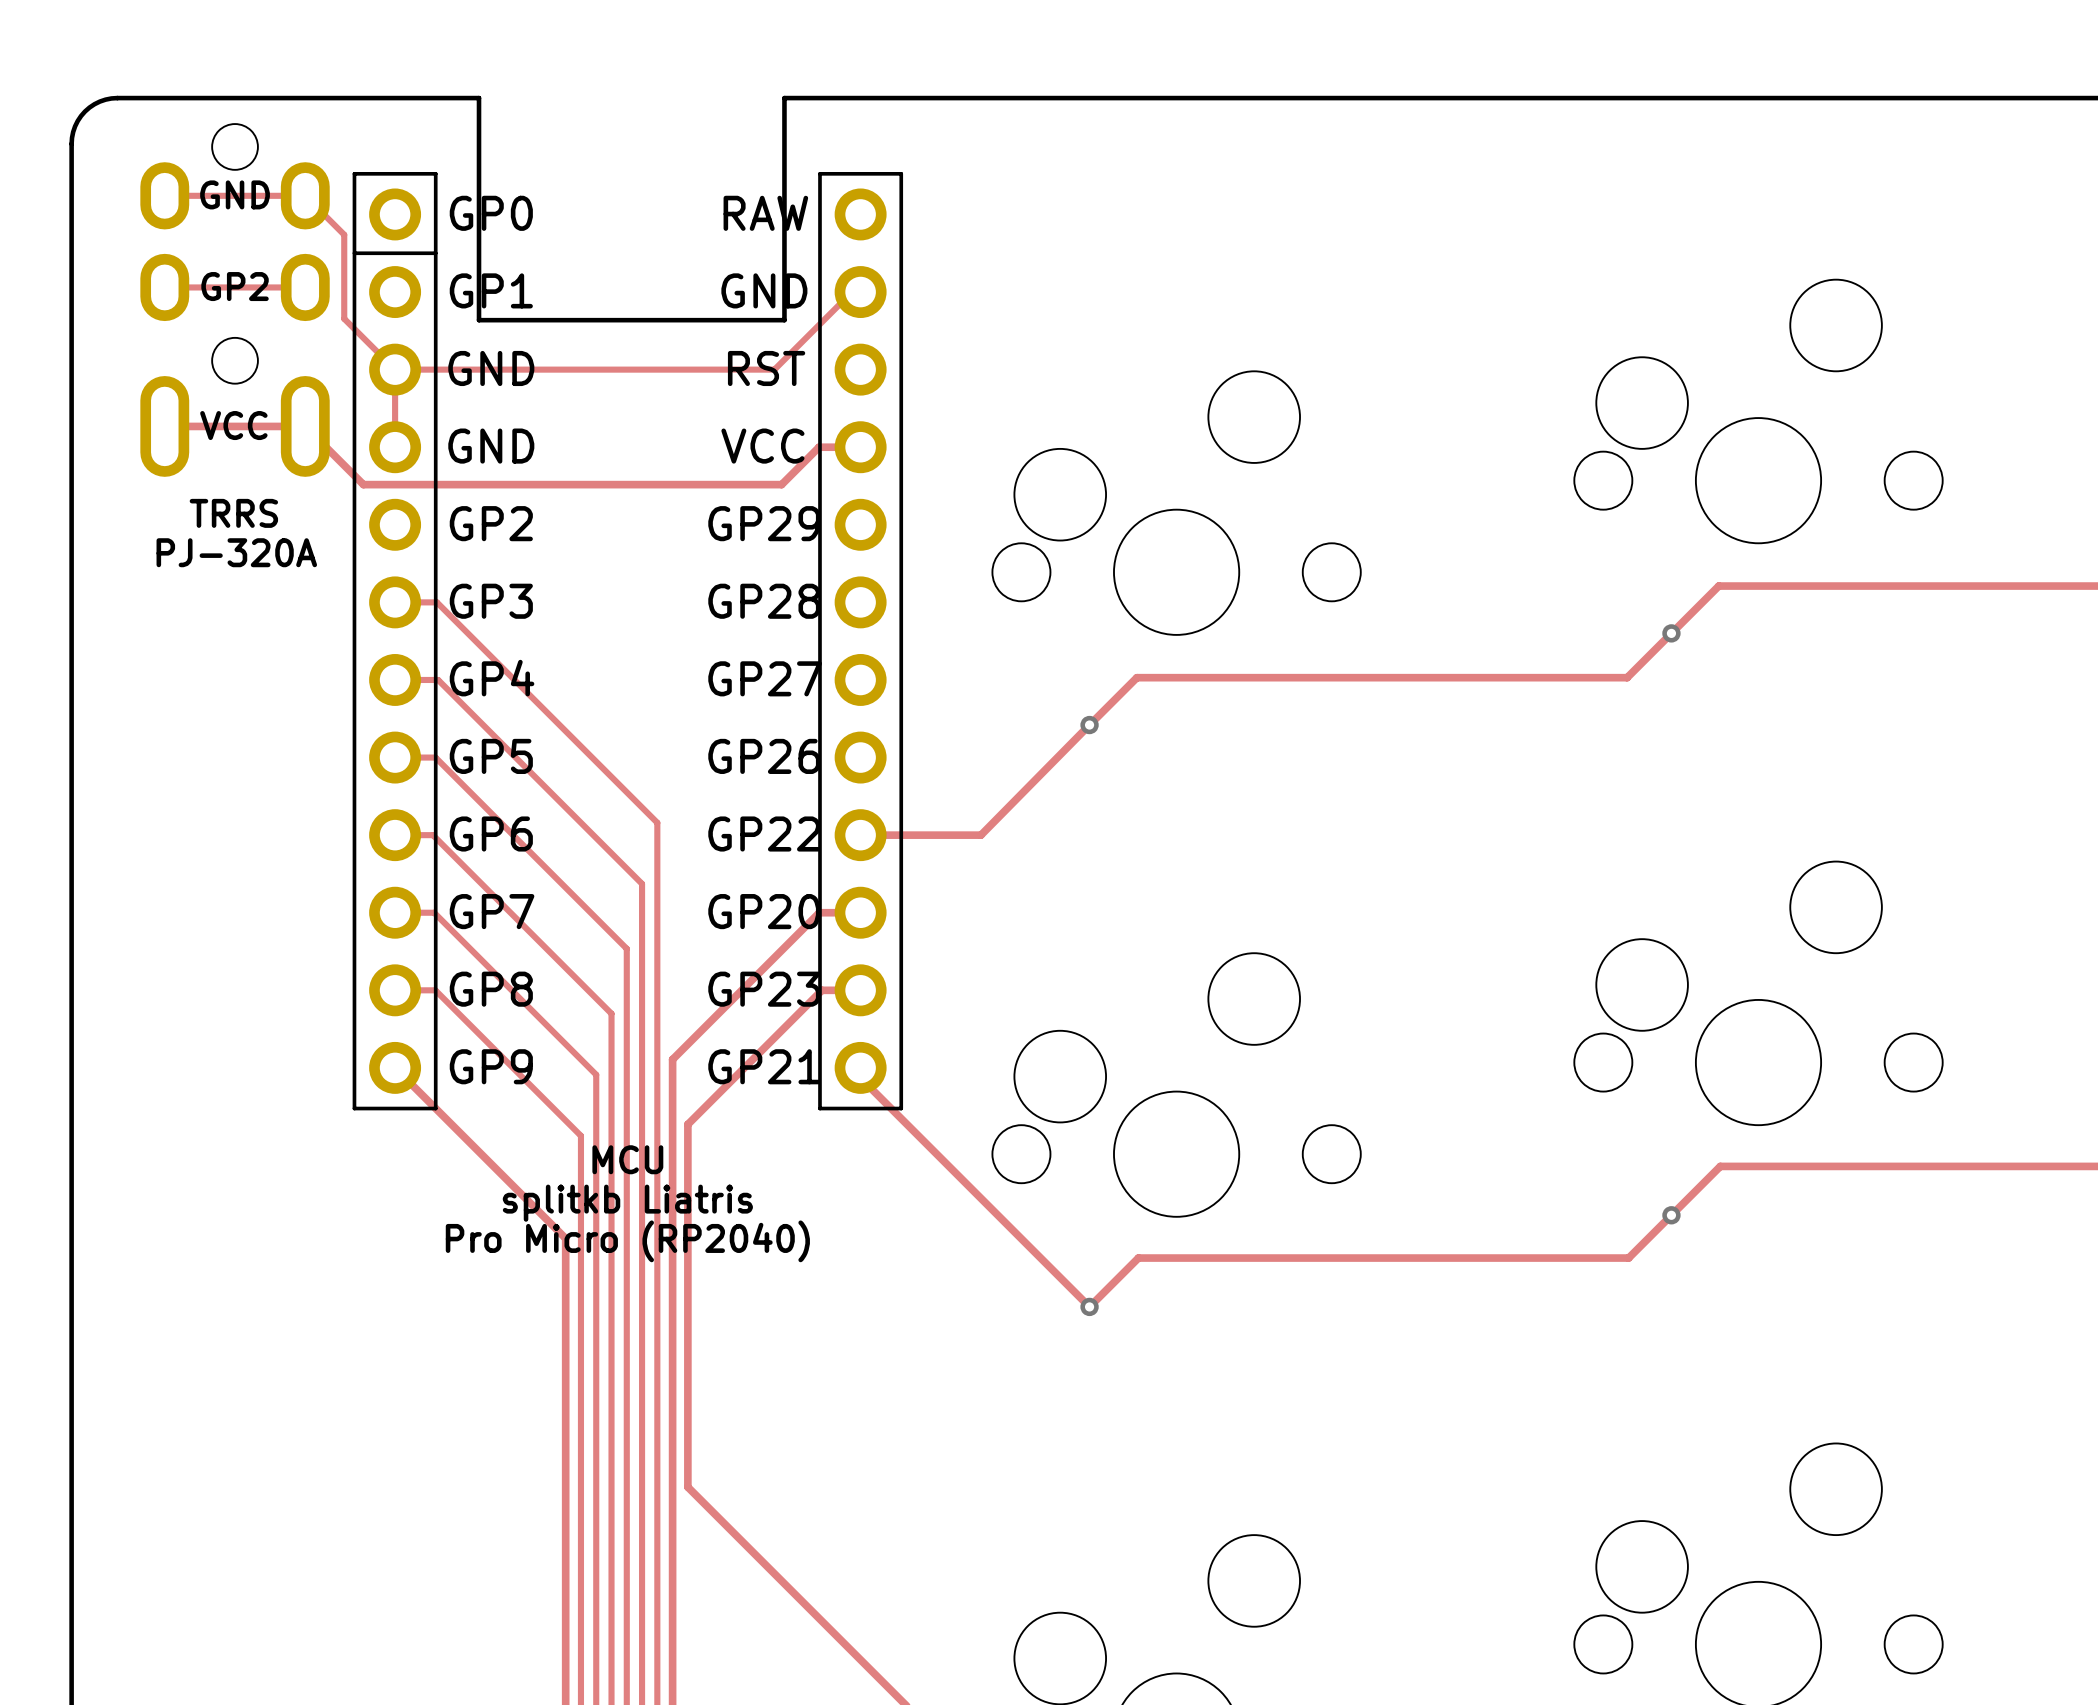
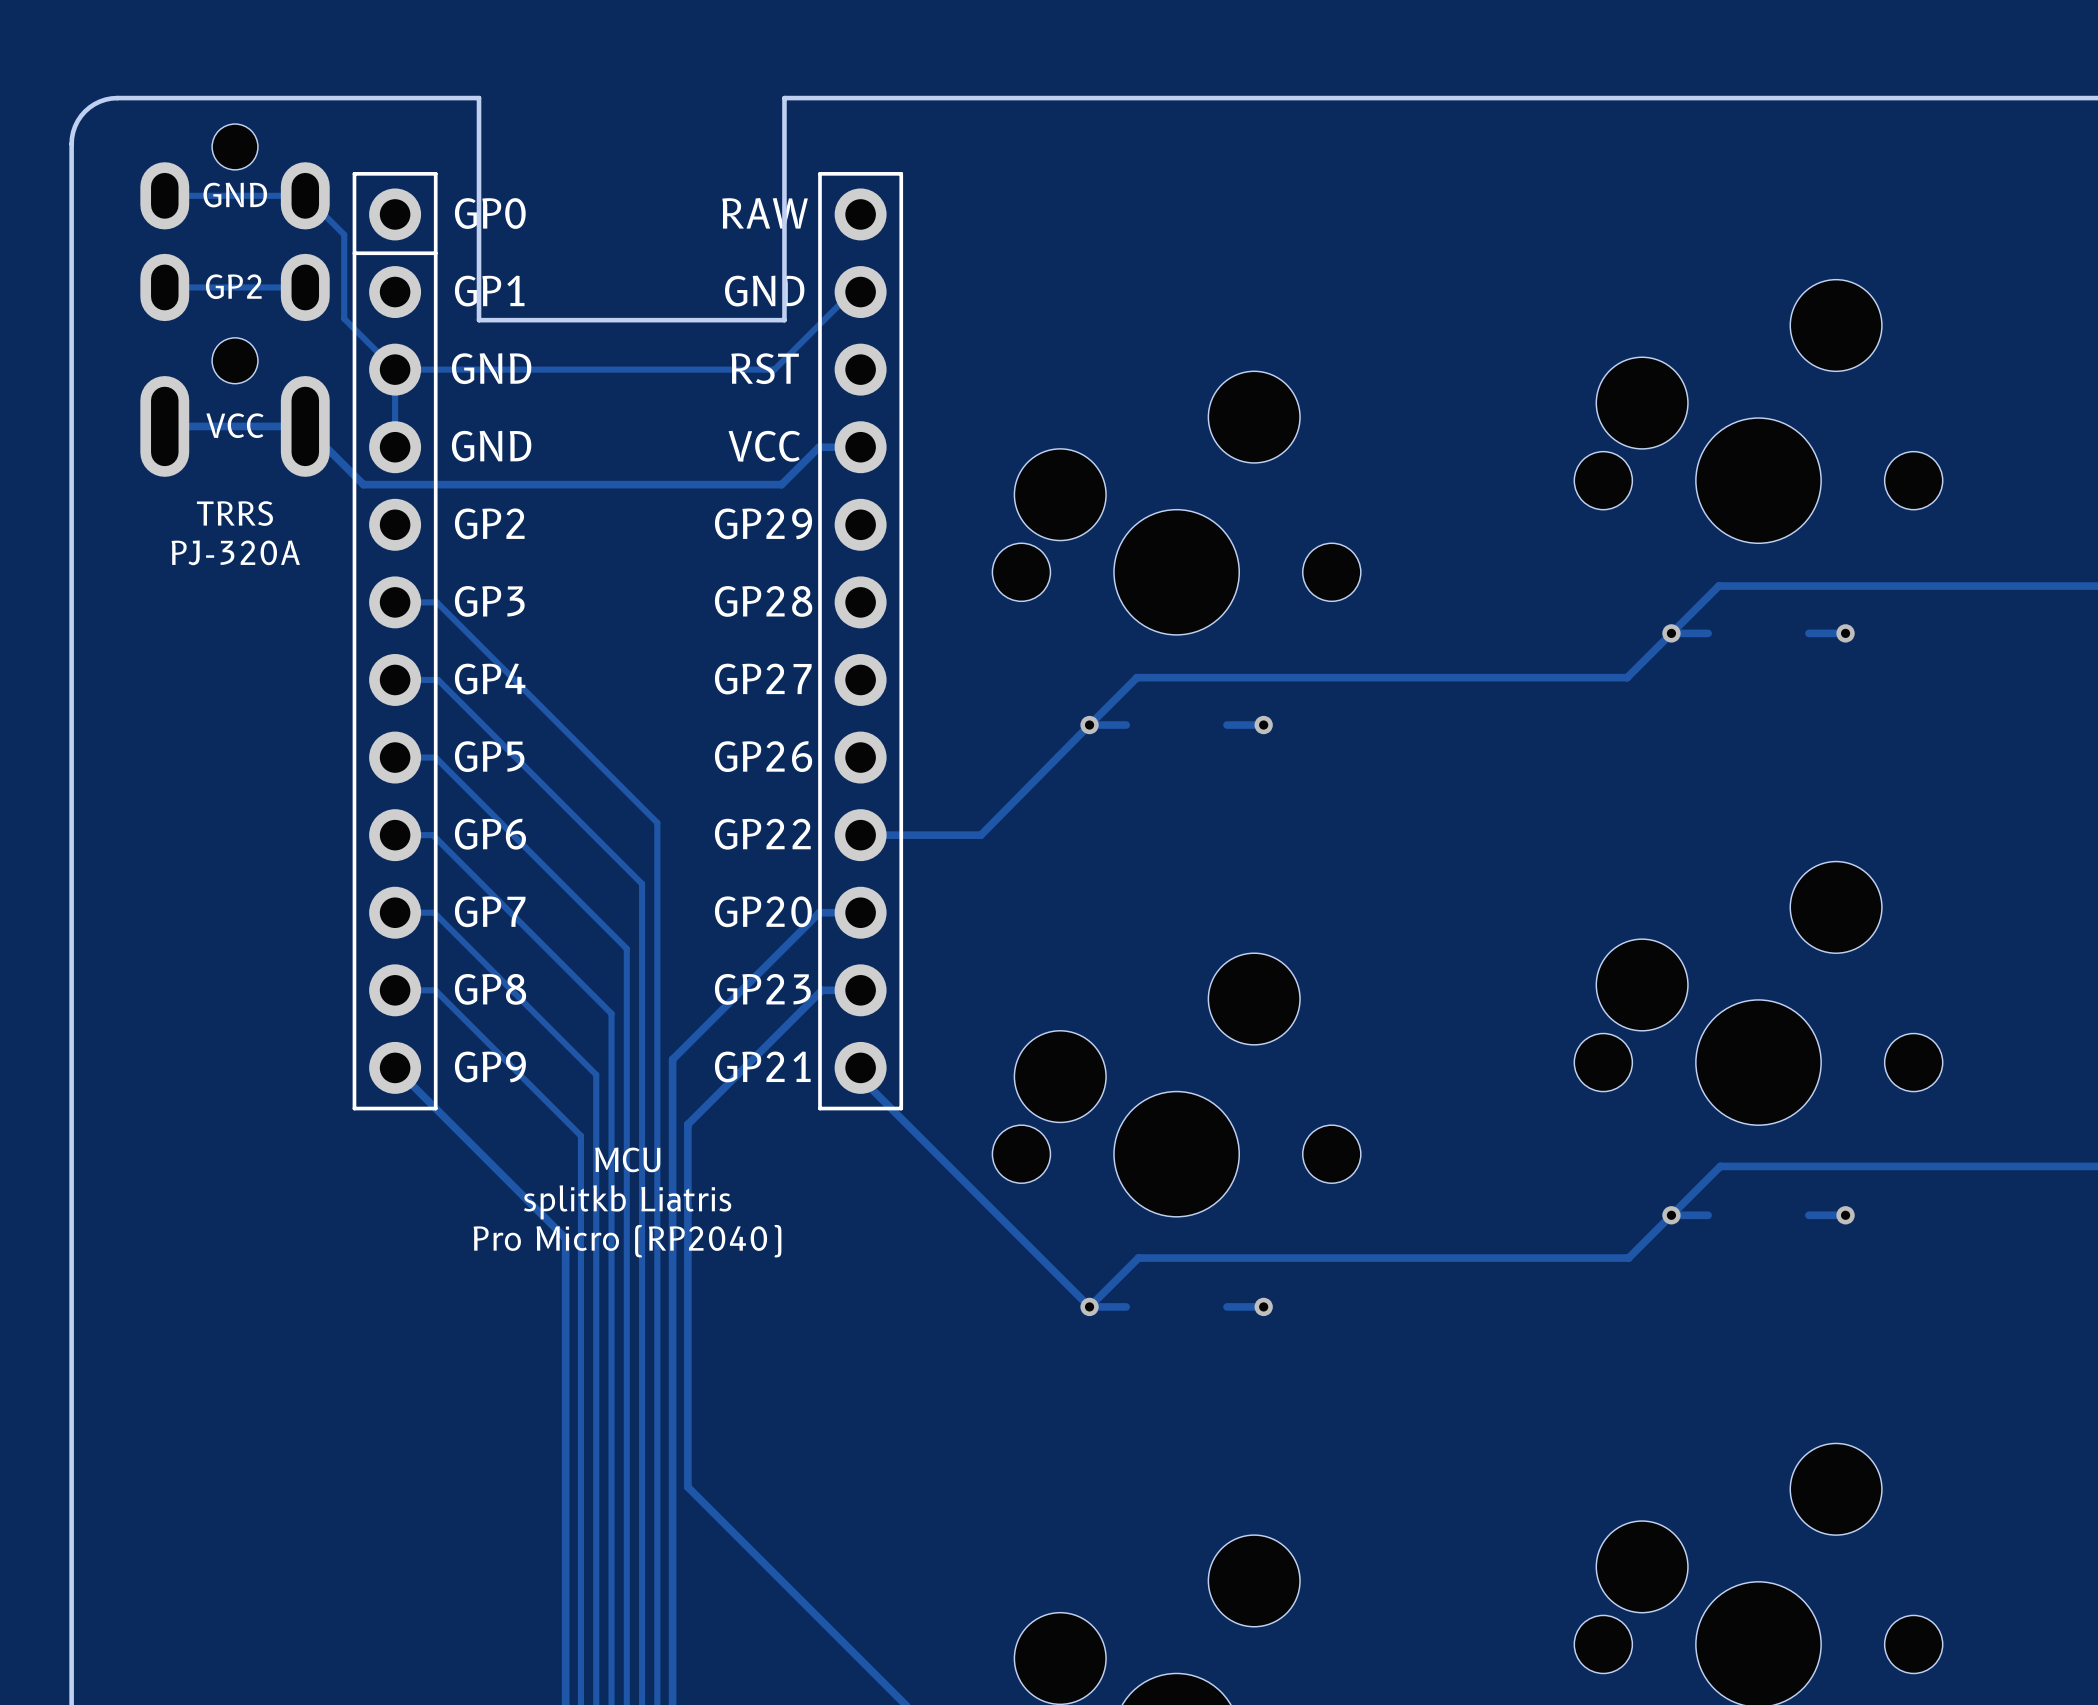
track: none -> (1671, 633) (1708, 633)
track: none -> (1808, 633) (1845, 633)
via: none -> (1845, 633)
track: none -> (1089, 725) (1126, 725)
track: none -> (1227, 725) (1263, 725)
via: none -> (1263, 725)
track: none -> (1671, 1215) (1708, 1215)
track: none -> (1808, 1215) (1845, 1215)
via: none -> (1845, 1215)
track: none -> (1089, 1306) (1126, 1306)
track: none -> (1227, 1306) (1263, 1306)
via: none -> (1263, 1306)

